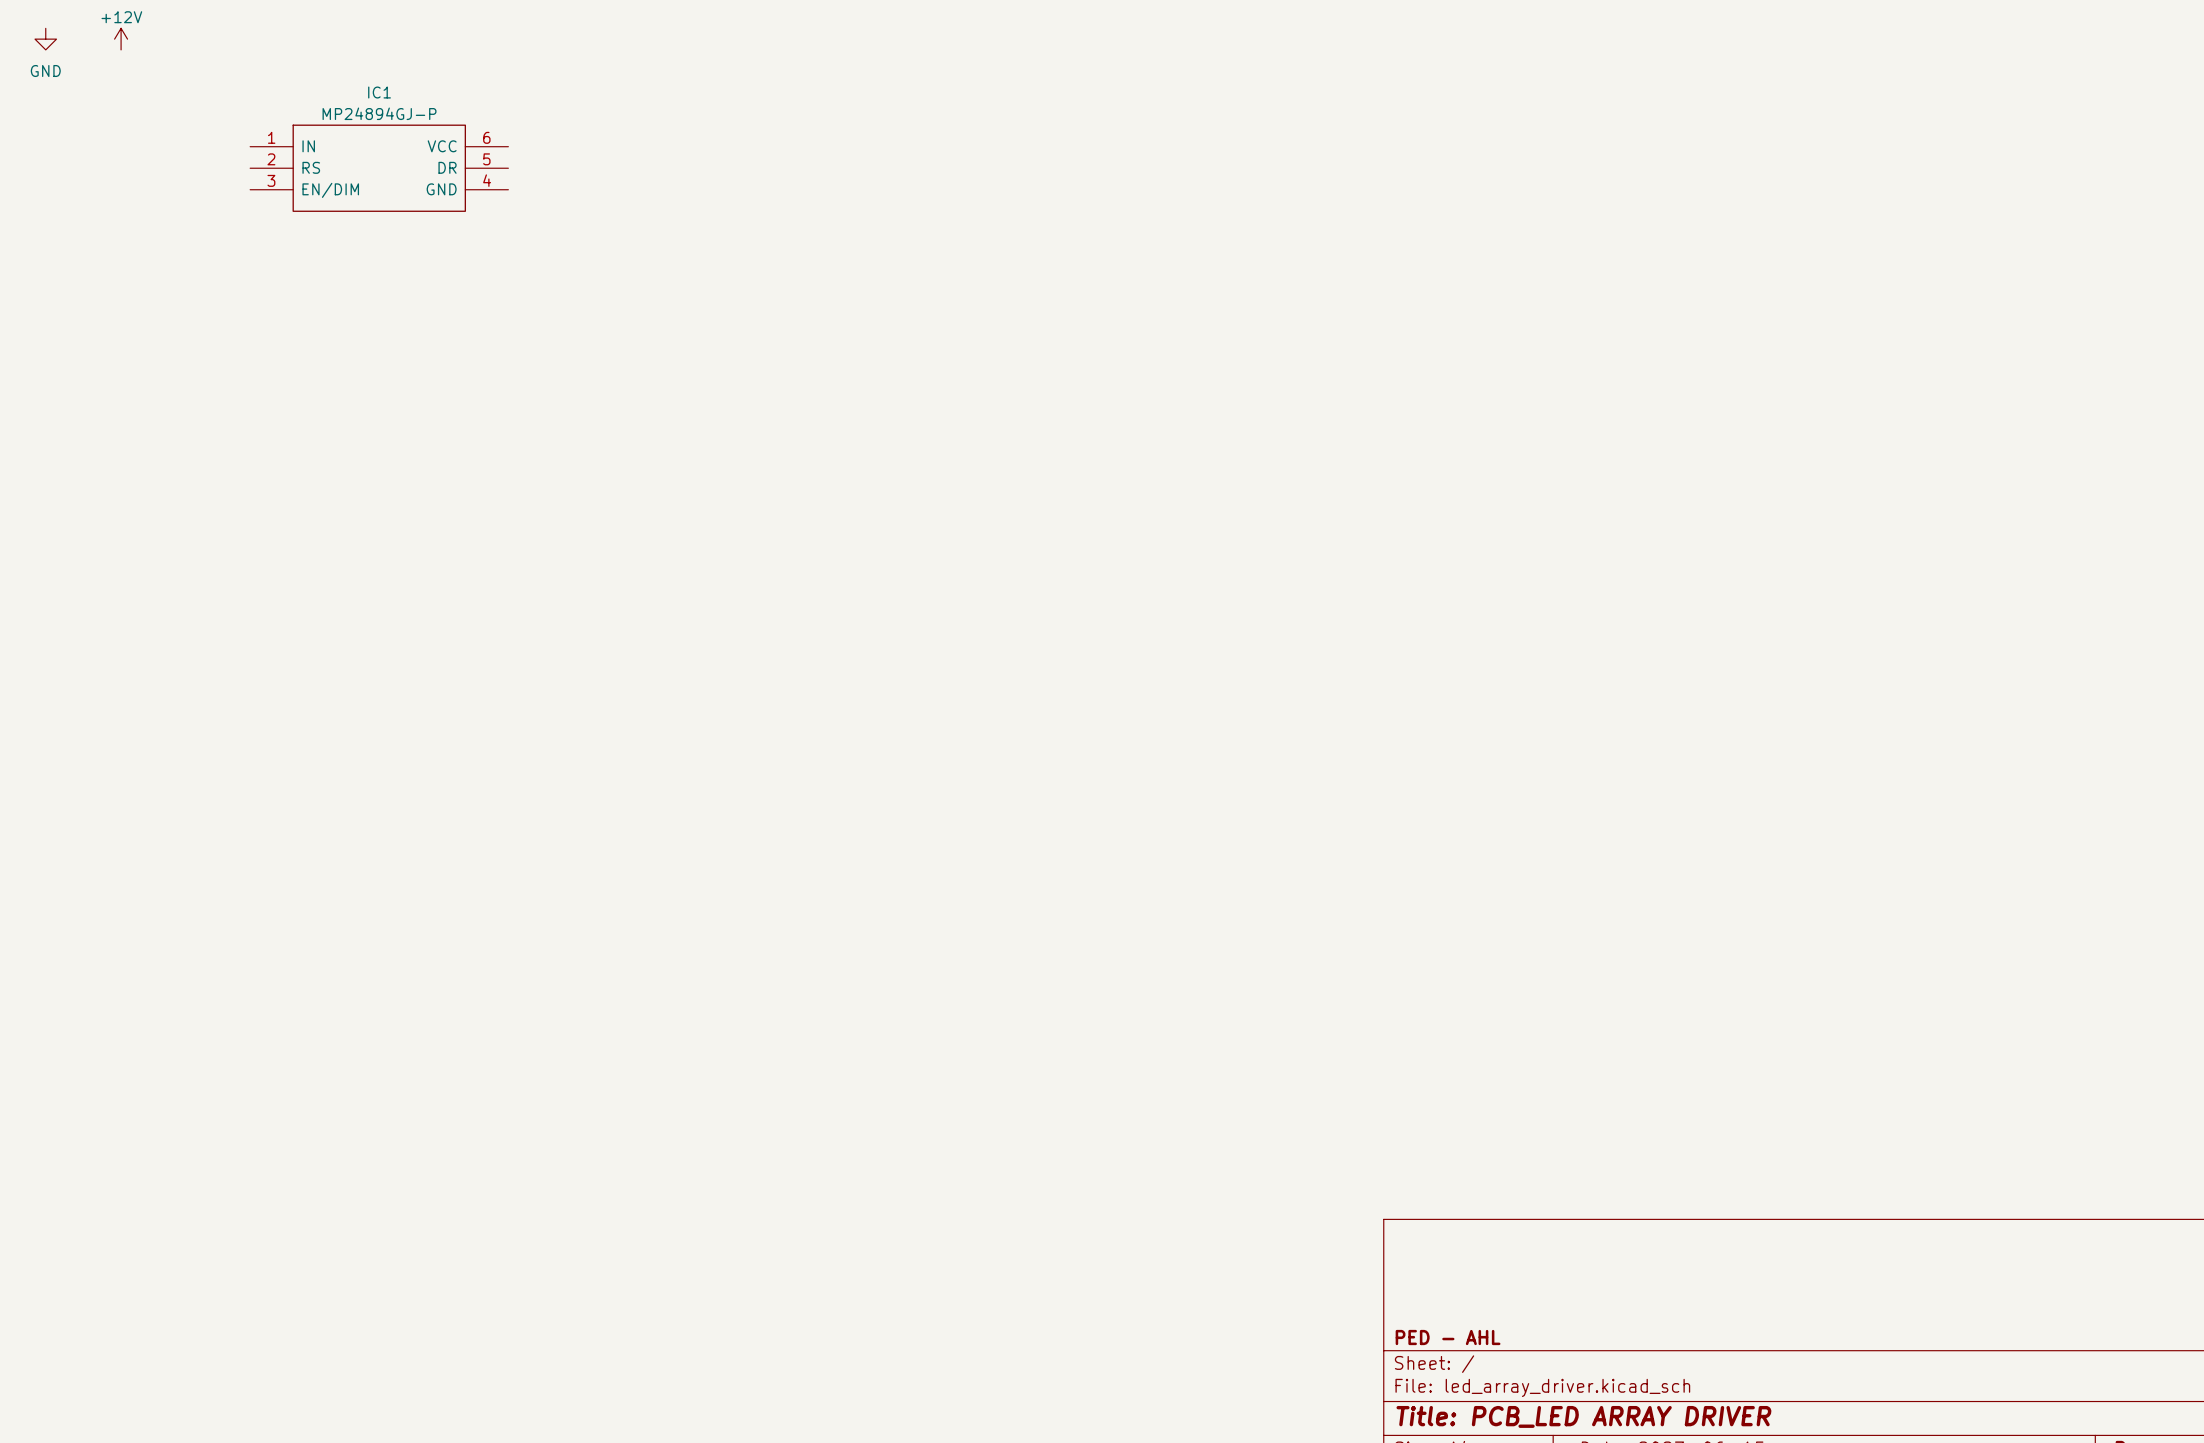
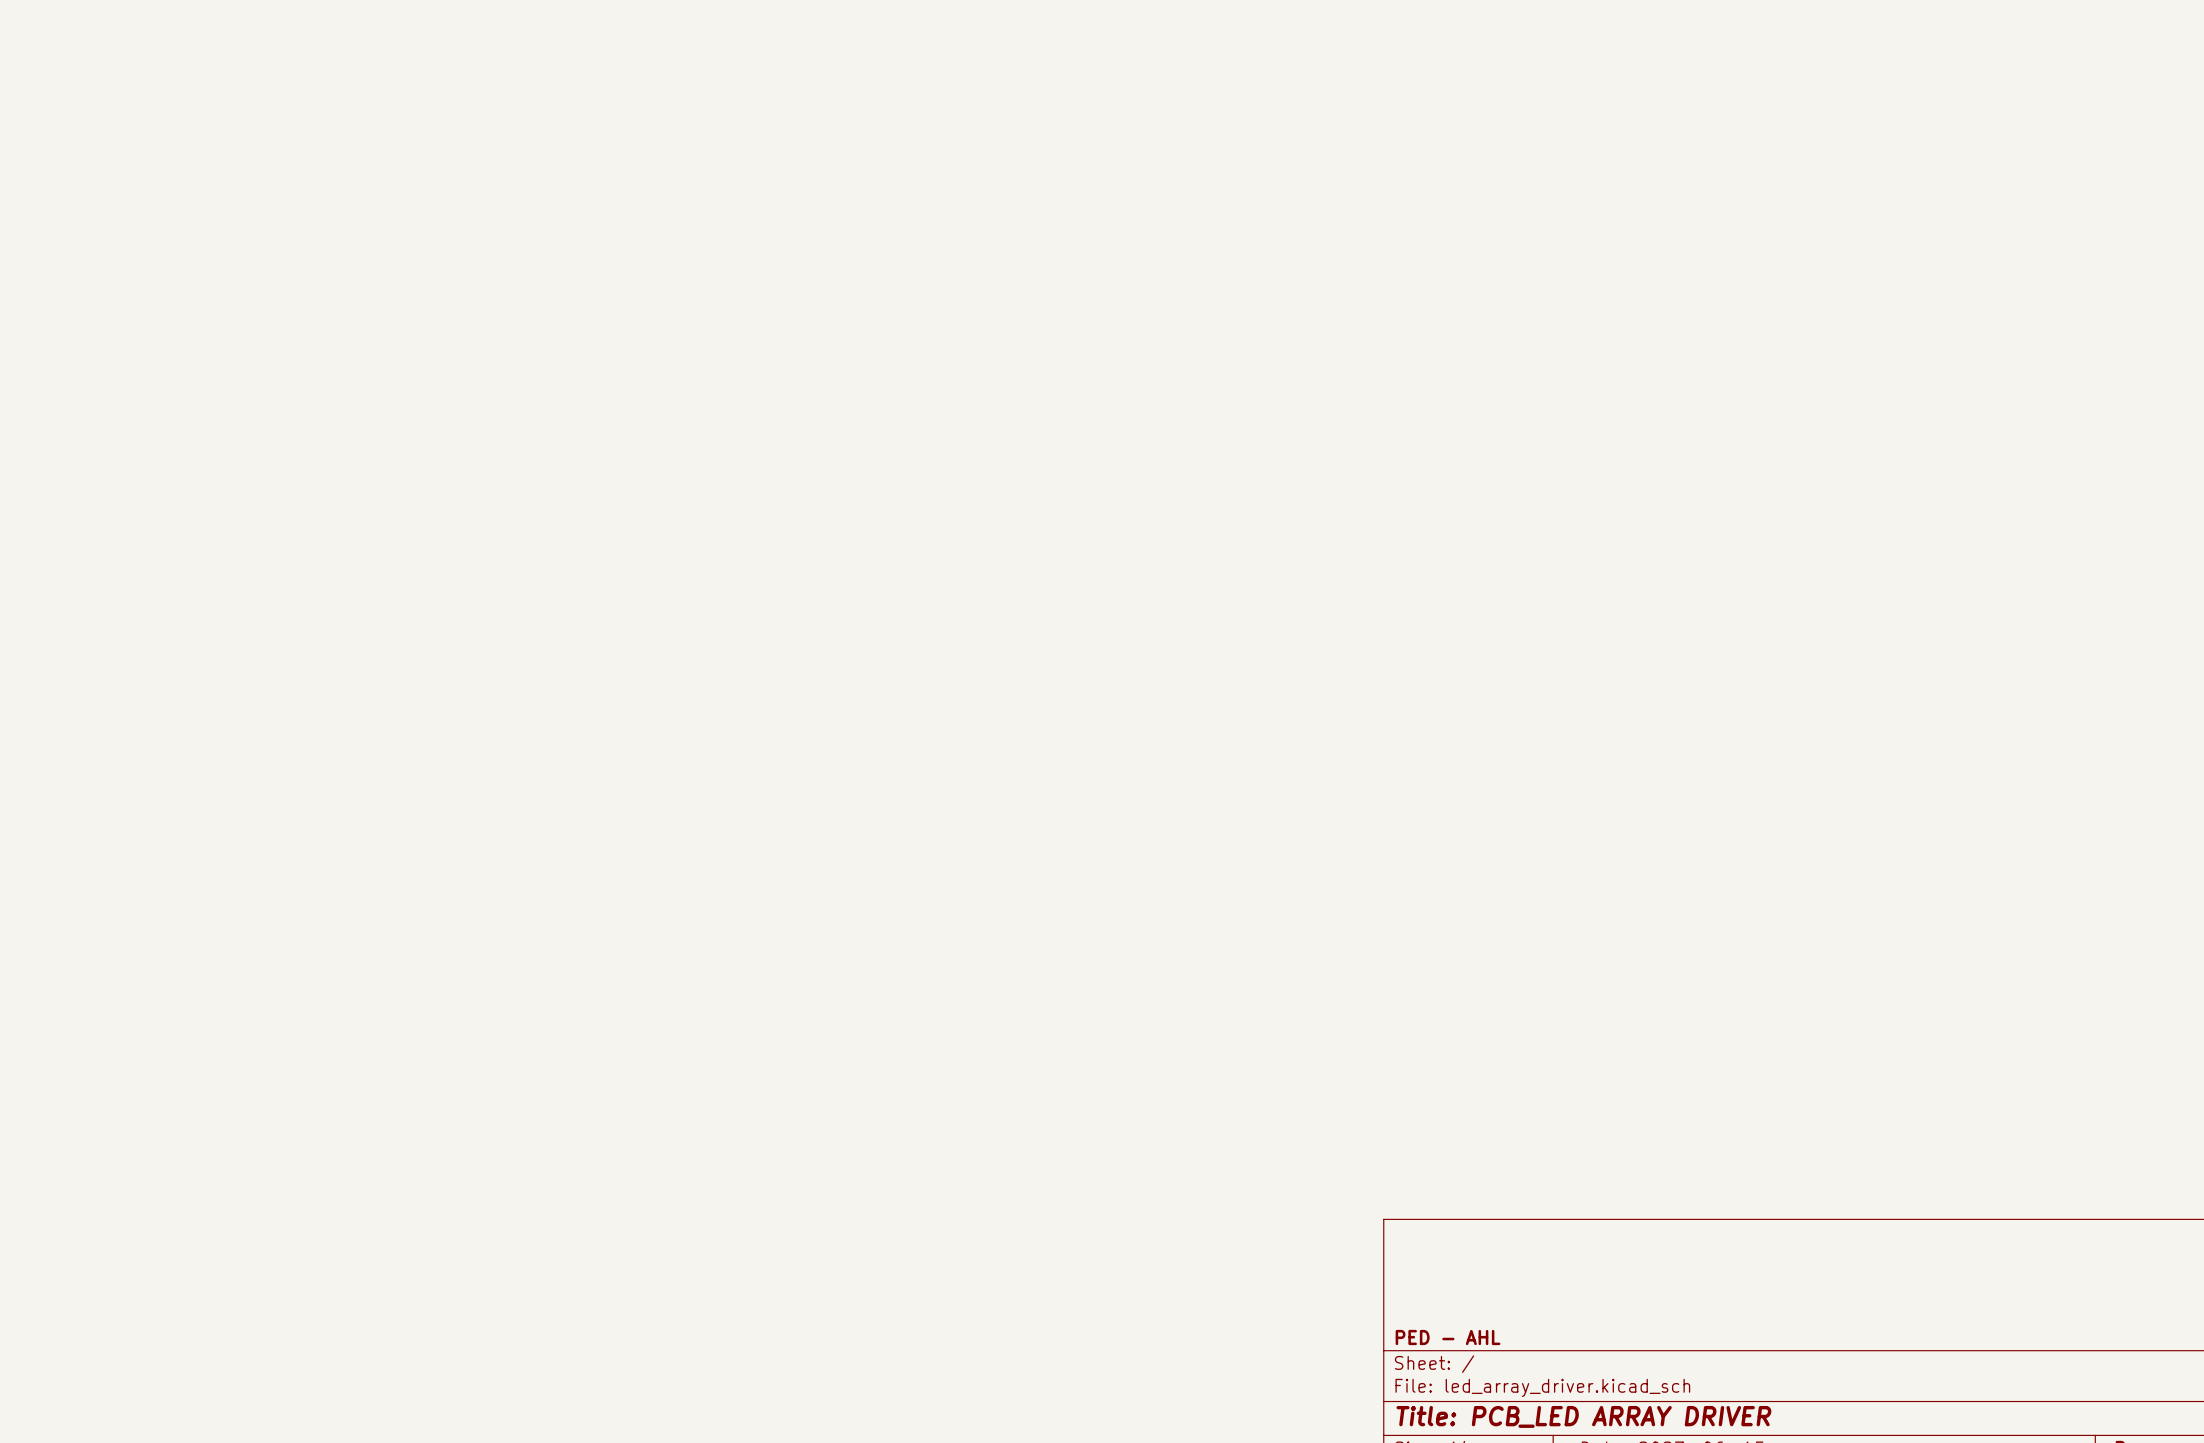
power symbol: GND (45, 39) -> none
power symbol: +12V (121, 39) -> none
IC1: MP24894GJ-P (379, 168) -> none

